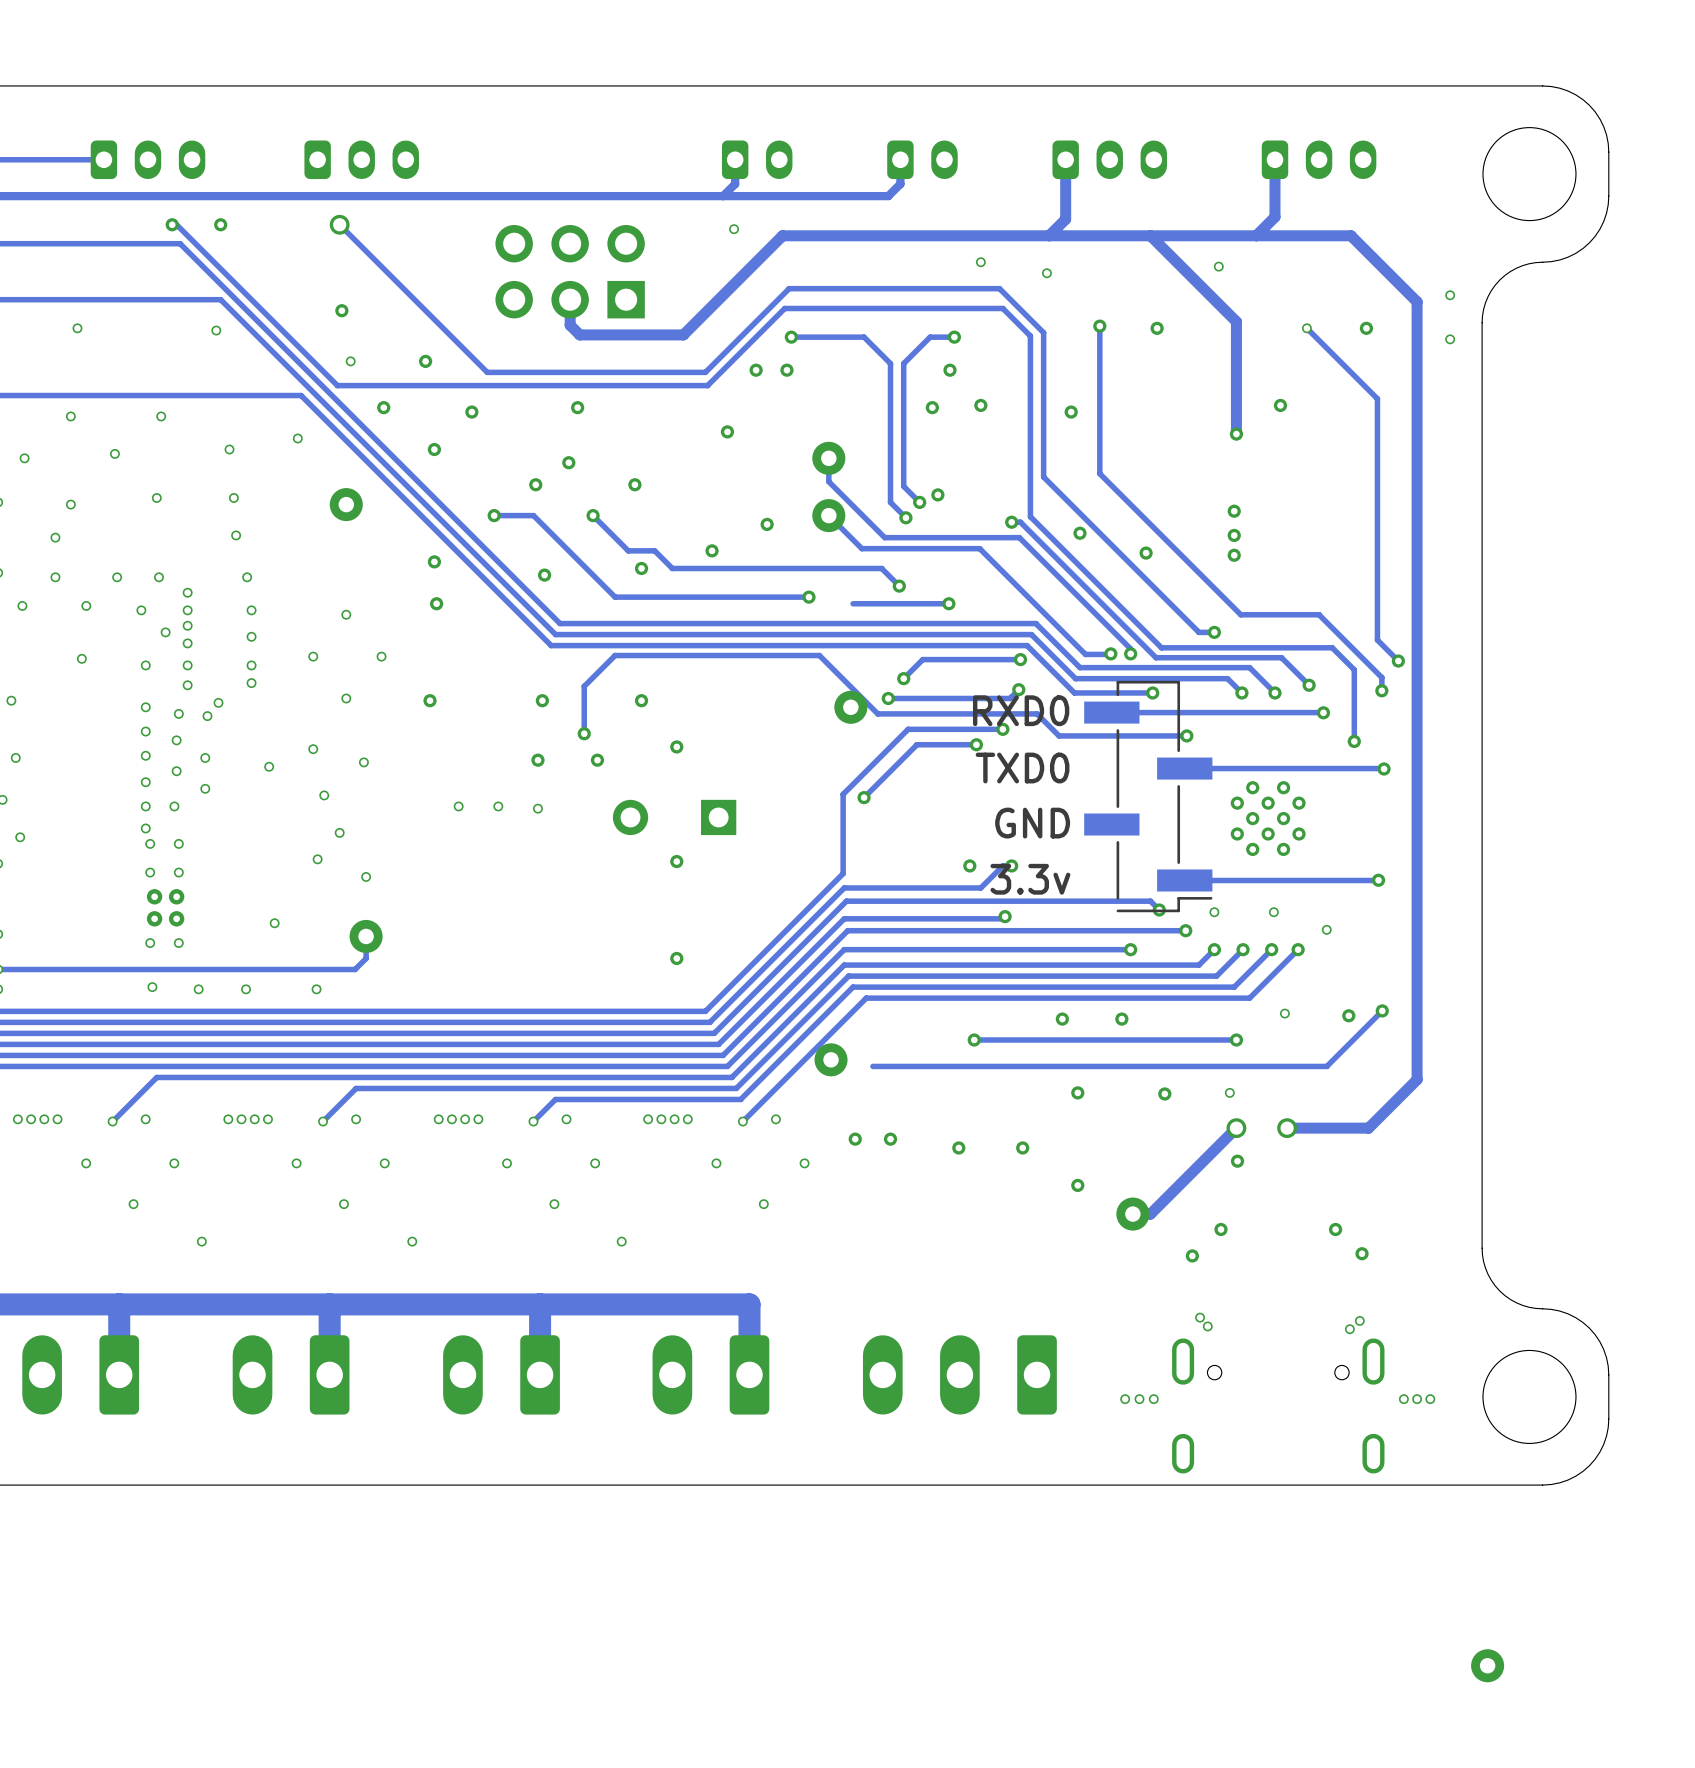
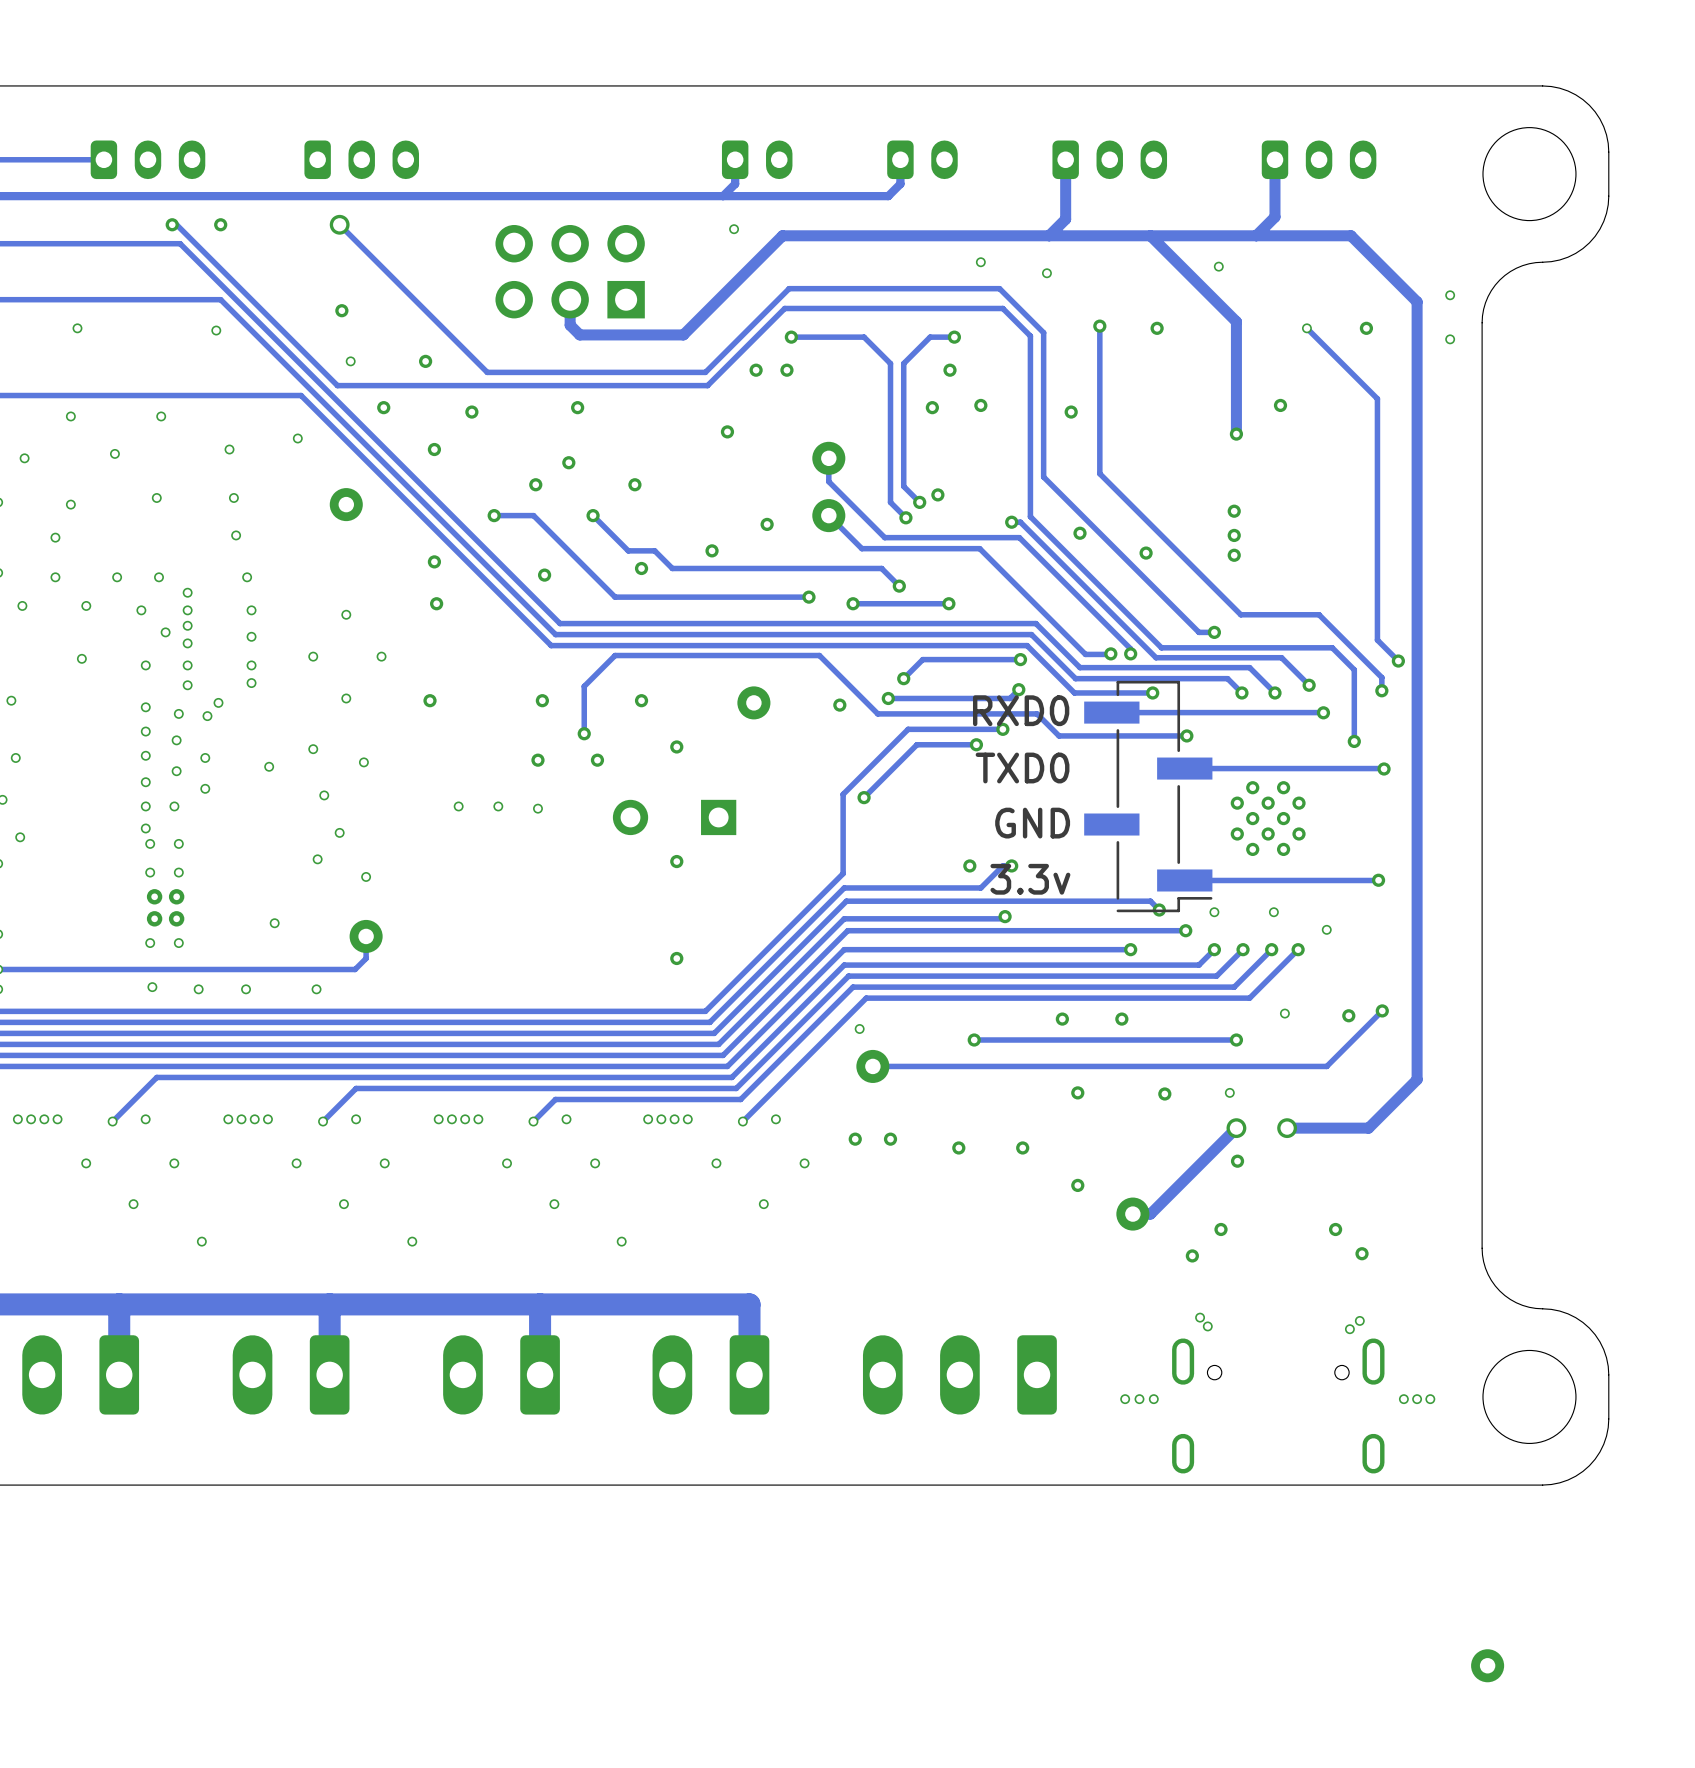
via: none -> (853, 603)
via: none -> (839, 705)
part position: (850, 707) -> (753, 702)
via: none -> (859, 1028)
part position: (831, 1059) -> (872, 1066)

